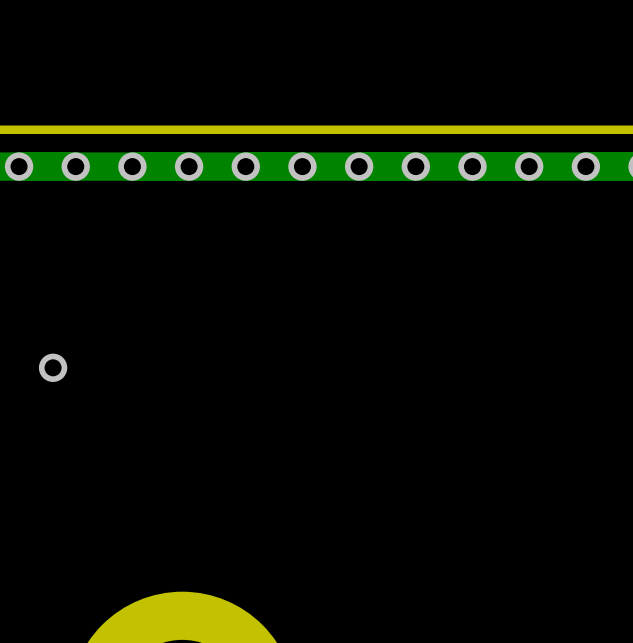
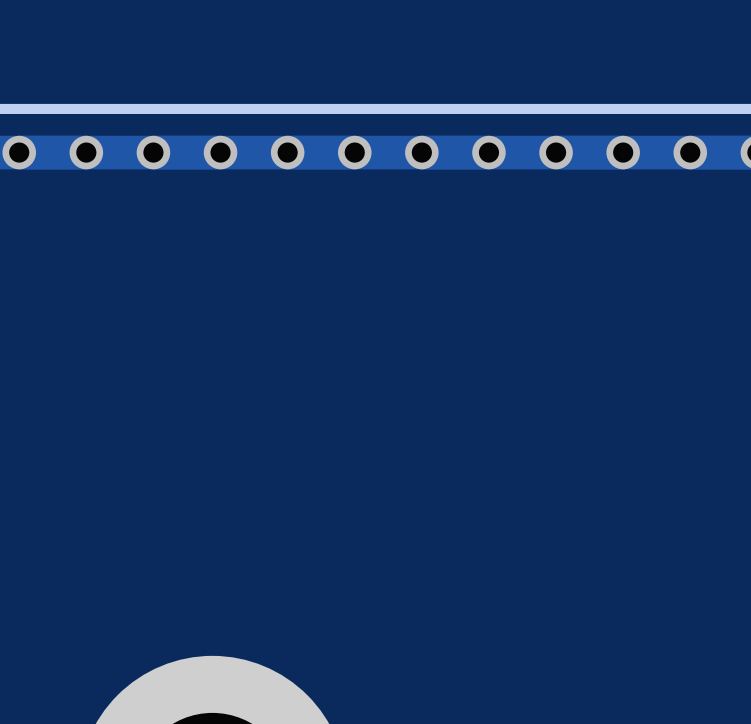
via: (53, 367) -> none

